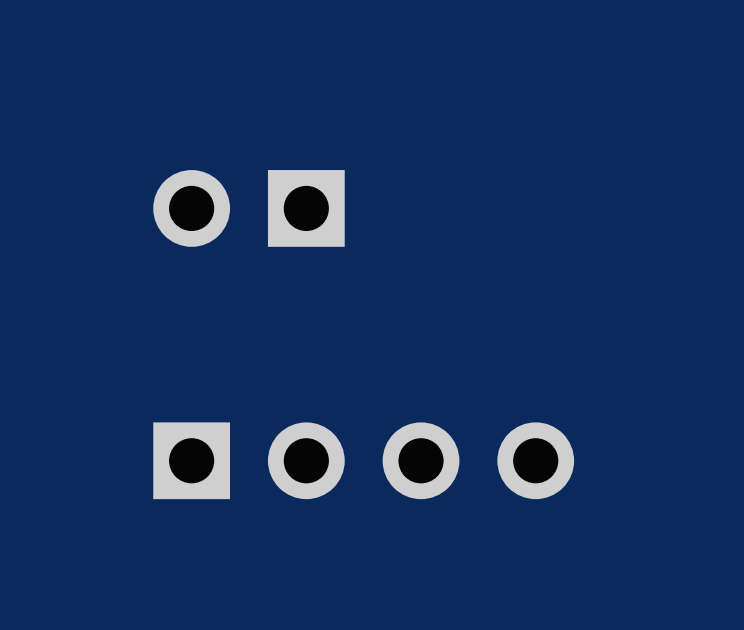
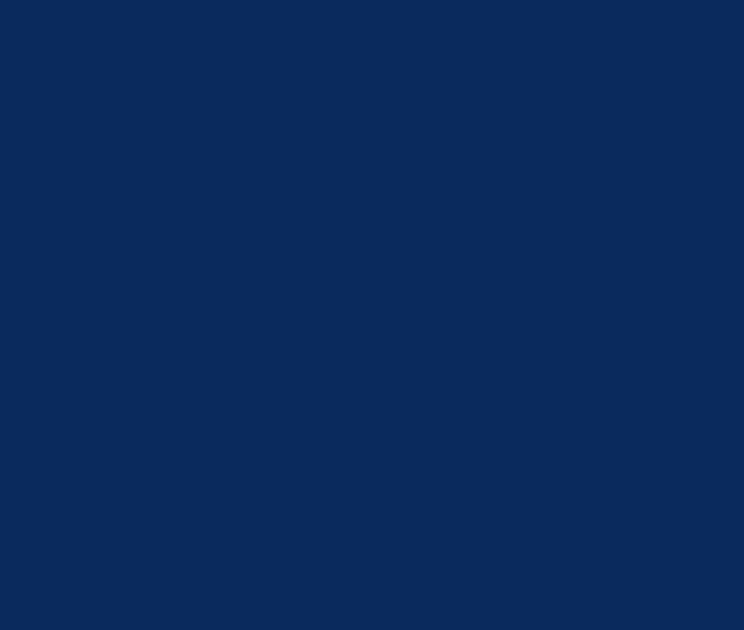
part: (248, 208) -> none
part: (363, 460) -> none

